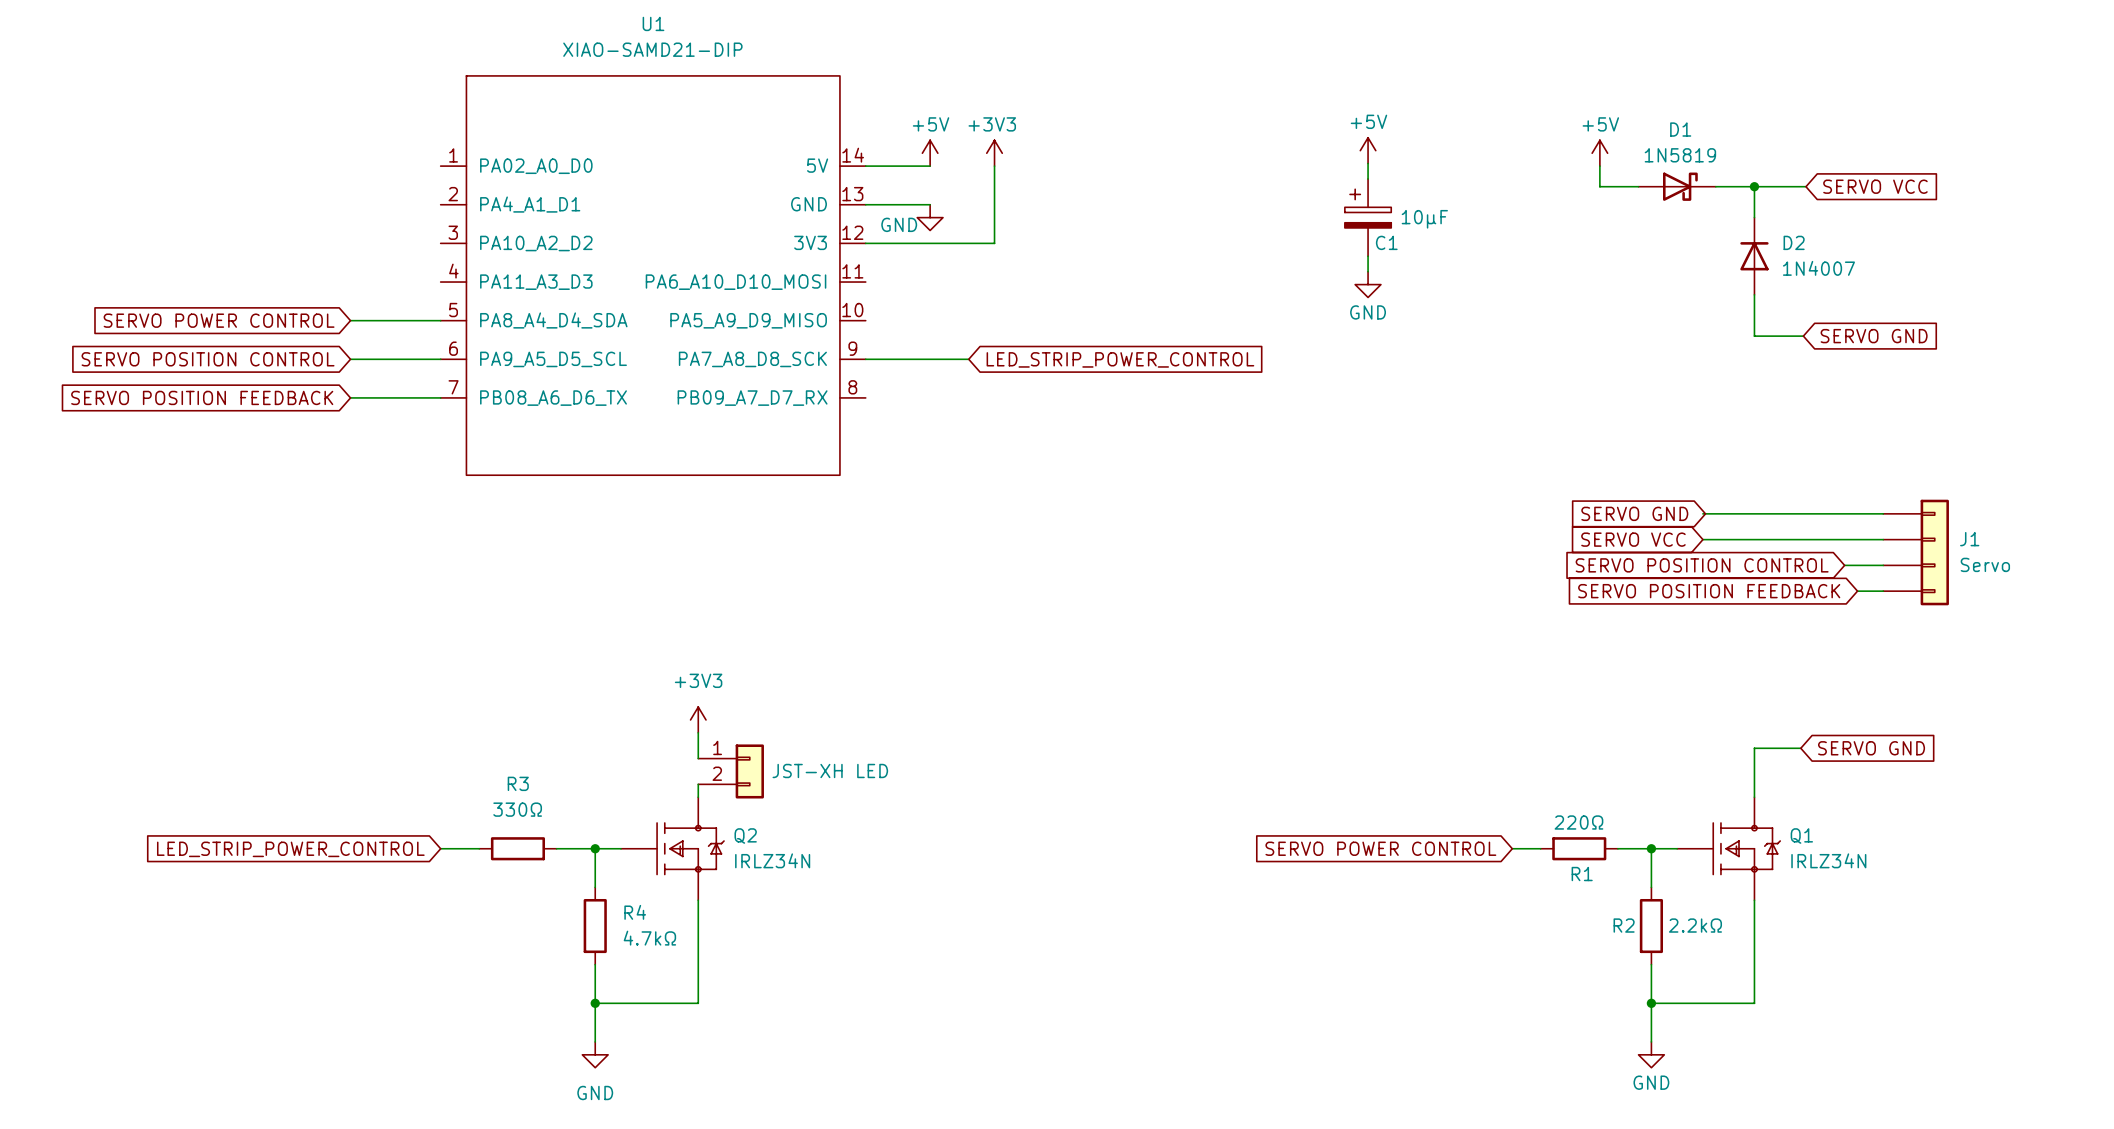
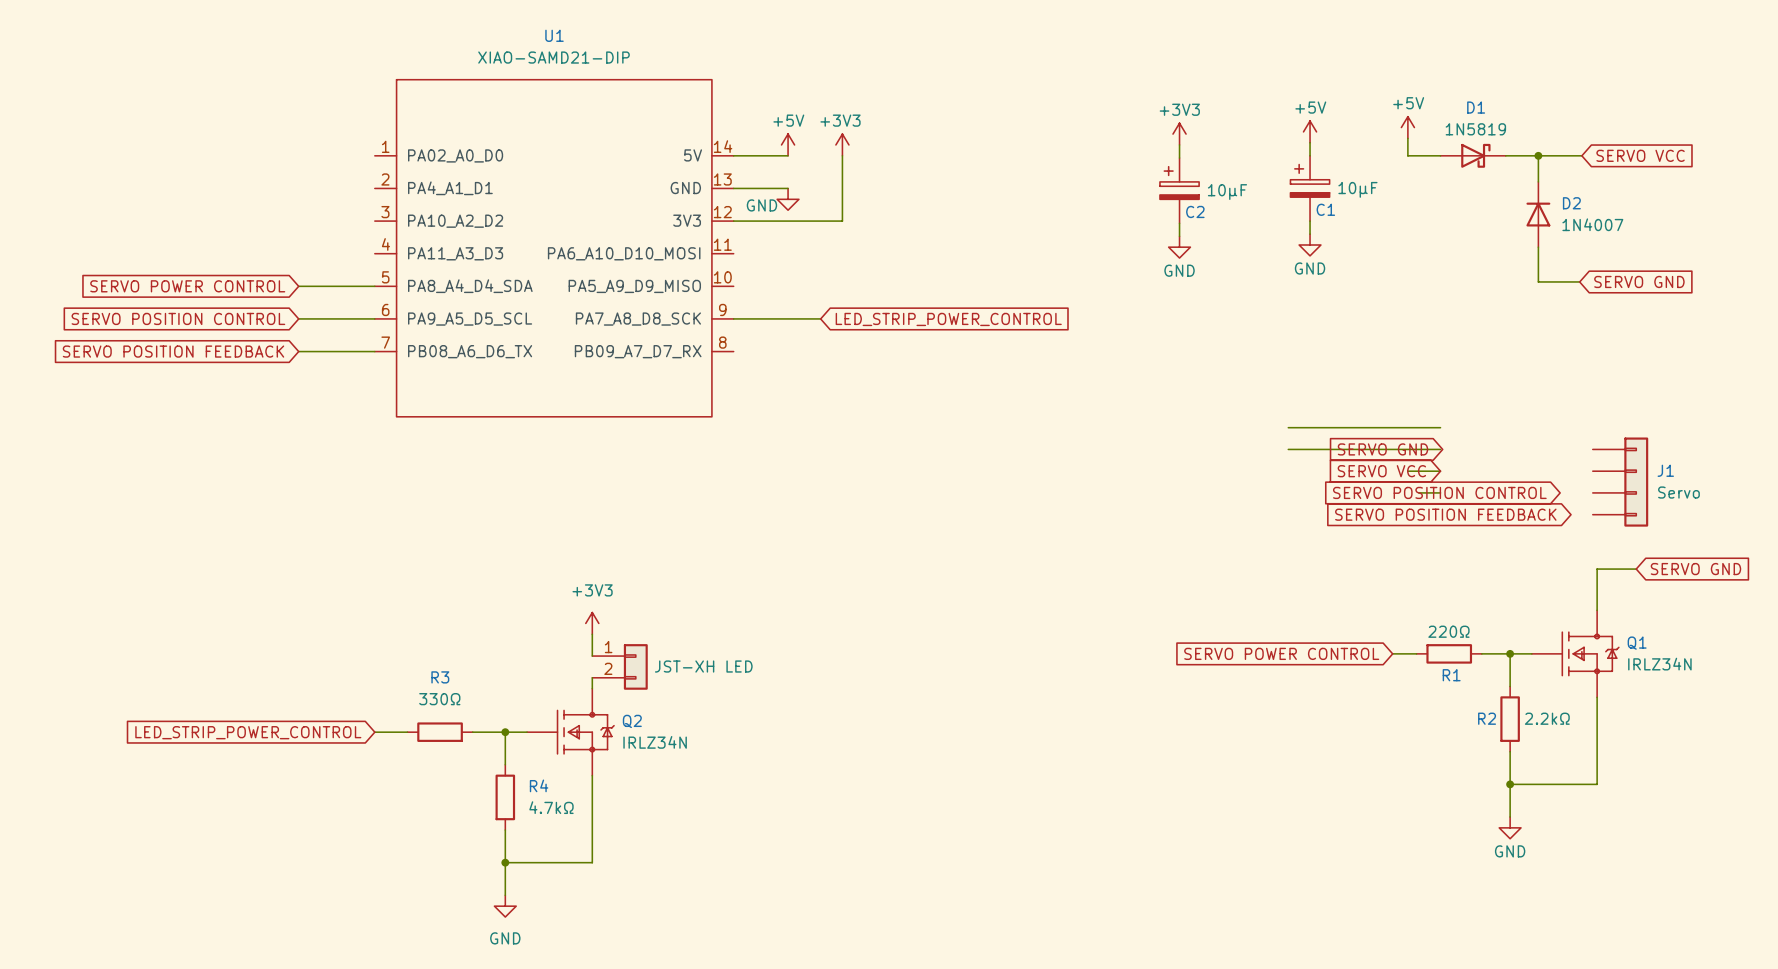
power symbol: none -> +5V (1407, 127)
power symbol: none -> +5V (1310, 131)
power symbol: none -> +3V3 (1179, 134)
power symbol: +5V (1368, 150) -> none
wire: none -> (1310, 142) (1310, 155)
power symbol: +5V (1599, 153) -> none
wire: (1368, 163) (1368, 178) -> (1179, 144) (1179, 158)
wire: (1599, 166) (1599, 186) (1638, 186) -> (1407, 138) (1407, 155) (1440, 155)
junction: none -> (1538, 155)
D1 position: (1677, 186) -> (1473, 155)
wire: (1715, 186) (1805, 186) -> (1505, 155) (1581, 155)
wire: (1754, 186) (1754, 217) -> (1538, 155) (1538, 181)
junction: (1754, 186) -> none
global label position: SERVO VCC (1875, 186) -> SERVO VCC (1640, 155)
C2: none -> 10µF (1179, 190)
C1 position: (1368, 217) -> (1310, 188)
wire: none -> (1310, 221) (1310, 234)
wire: (1368, 256) (1368, 271) -> (1179, 223) (1179, 236)
D2 position: (1754, 256) -> (1538, 214)
power symbol: none -> GND (1310, 245)
power symbol position: GND (1368, 284) -> GND (1179, 247)
wire: (1754, 294) (1754, 336) (1803, 336) -> (1538, 247) (1538, 281) (1579, 281)
global label position: SERVO GND (1874, 336) -> SERVO GND (1639, 281)
wire: none -> (1288, 427) (1440, 427)
wire: (1702, 513) (1883, 513) -> (1440, 449) (1288, 449)
wire: (1702, 539) (1883, 539) -> (1440, 471) (1407, 471)
wire: (1844, 565) (1883, 565) -> none
wire: (1857, 591) (1883, 591) -> (1418, 492) (1440, 492)
wire: (1800, 748) (1754, 748) (1754, 797) -> (1636, 569) (1597, 569) (1597, 610)
global label position: SERVO GND (1871, 748) -> SERVO GND (1695, 569)
junction: none -> (1510, 653)
global label position: SERVO POWER CONTROL (1380, 848) -> SERVO POWER CONTROL (1281, 653)
wire: (1512, 848) (1540, 848) -> (1392, 653) (1416, 653)
R1 position: (1579, 848) -> (1449, 653)
wire: (1617, 848) (1677, 848) -> (1481, 653) (1531, 653)
wire: (1651, 848) (1651, 887) -> (1510, 653) (1510, 686)
junction: (1651, 848) -> none
Q1 position: (1728, 848) -> (1575, 653)
wire: (1754, 900) (1754, 1003) (1651, 1003) -> (1597, 697) (1597, 784) (1510, 784)
junction: none -> (1510, 784)
R2 position: (1651, 926) -> (1510, 719)
wire: (1651, 964) (1651, 1041) -> (1510, 751) (1510, 817)
junction: (1651, 1003) -> none
power symbol position: GND (1651, 1054) -> GND (1510, 827)

